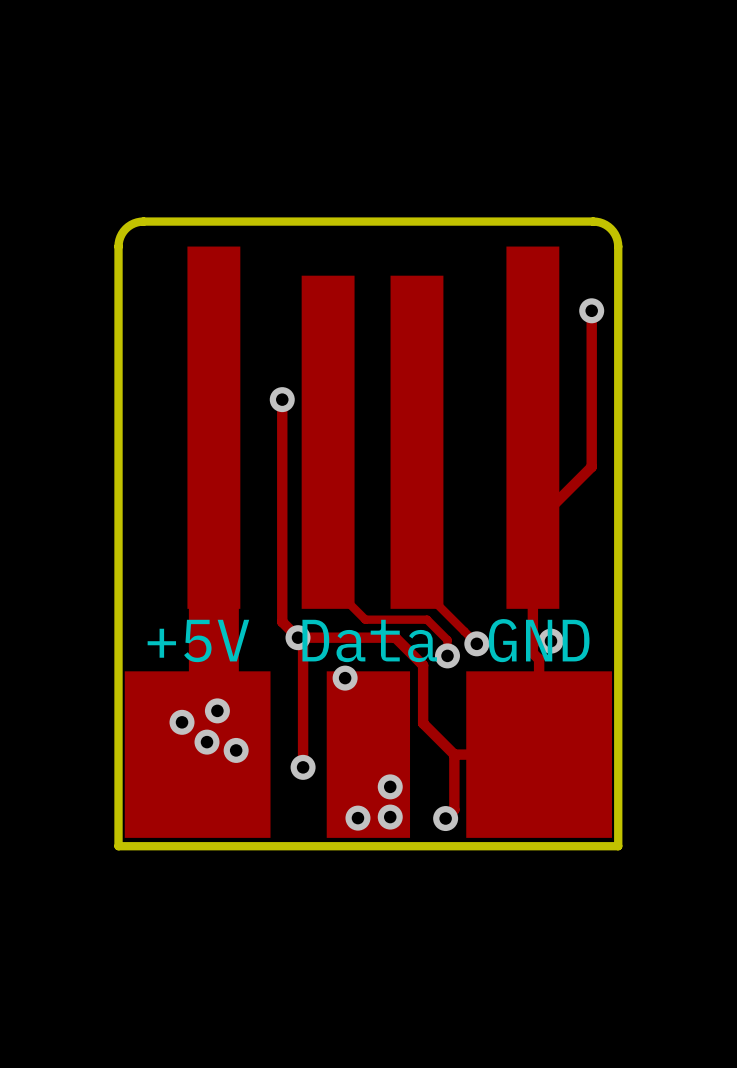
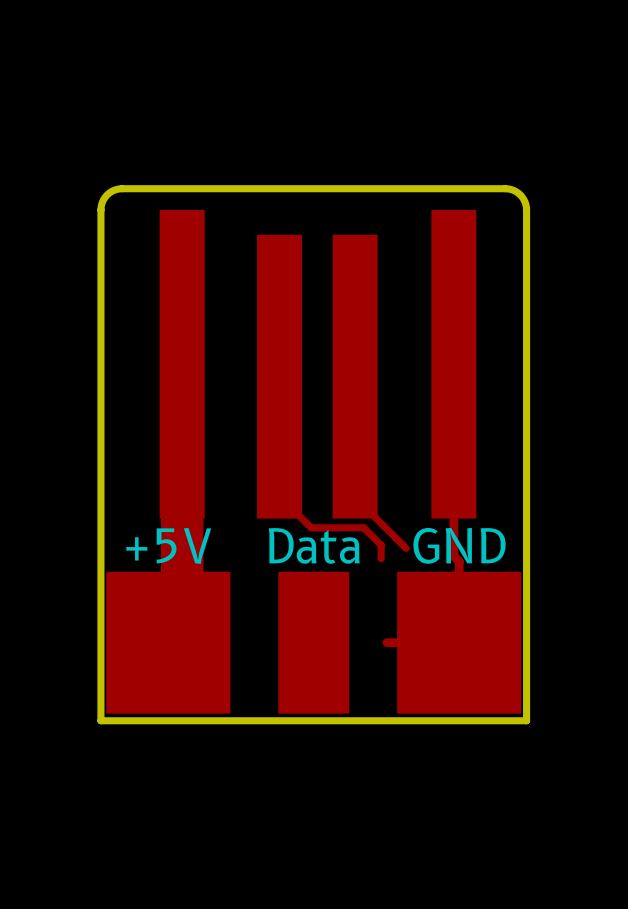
track: (591, 310) (591, 466) (532, 525) -> none
via: (591, 310) -> none
track: (282, 399) (282, 621) (303, 642) (303, 767) -> none
via: (282, 399) -> none
track: (298, 637) (395, 637) (423, 665) (423, 723) (454, 754) (454, 809) (445, 818) -> none
via: (298, 637) -> none
via: (550, 641) -> none
via: (476, 643) -> none
via: (447, 655) -> none
via: (345, 678) -> none
via: (217, 710) -> none
via: (182, 722) -> none
via: (207, 742) -> none
via: (236, 750) -> none
via: (303, 767) -> none
via: (390, 786) -> none
via: (390, 817) -> none
via: (357, 818) -> none
via: (445, 818) -> none

